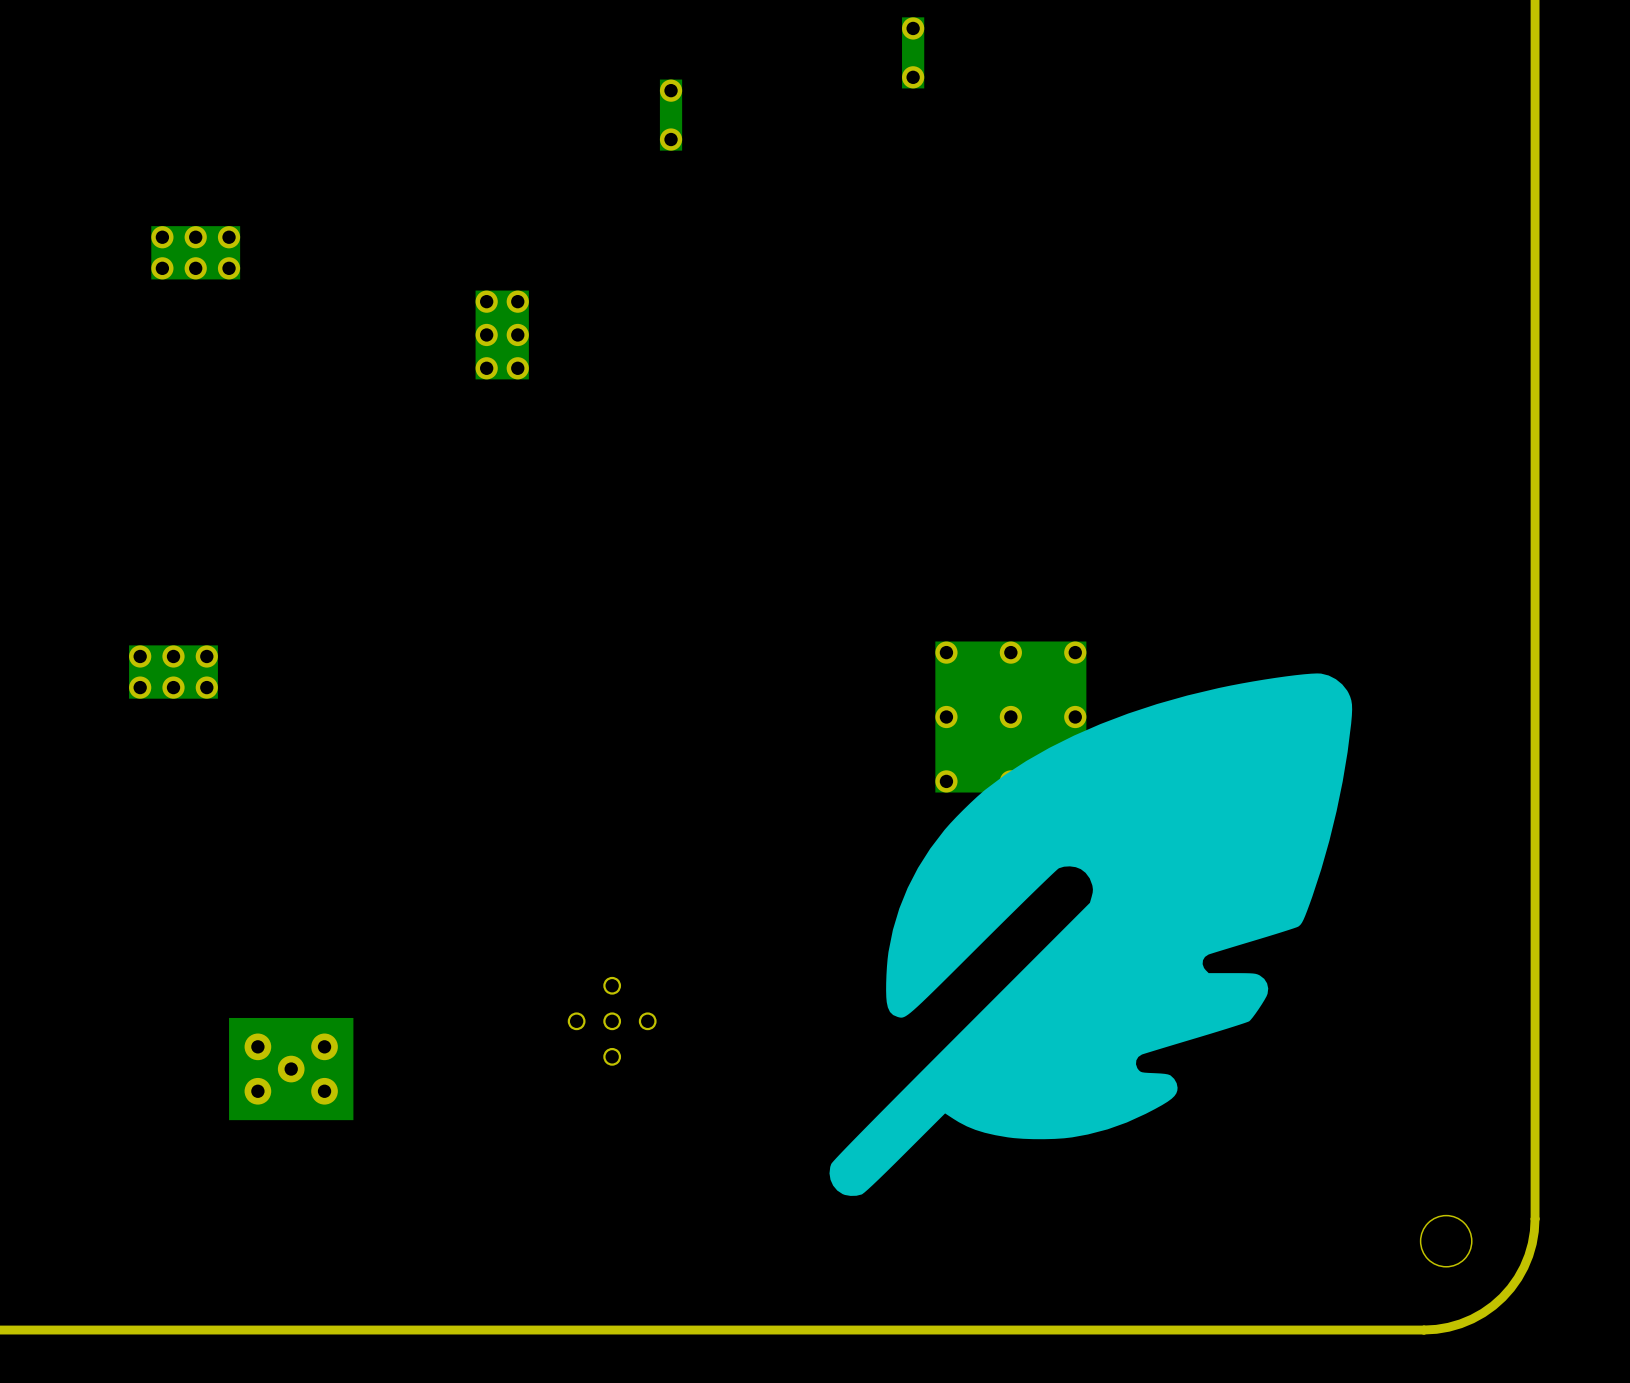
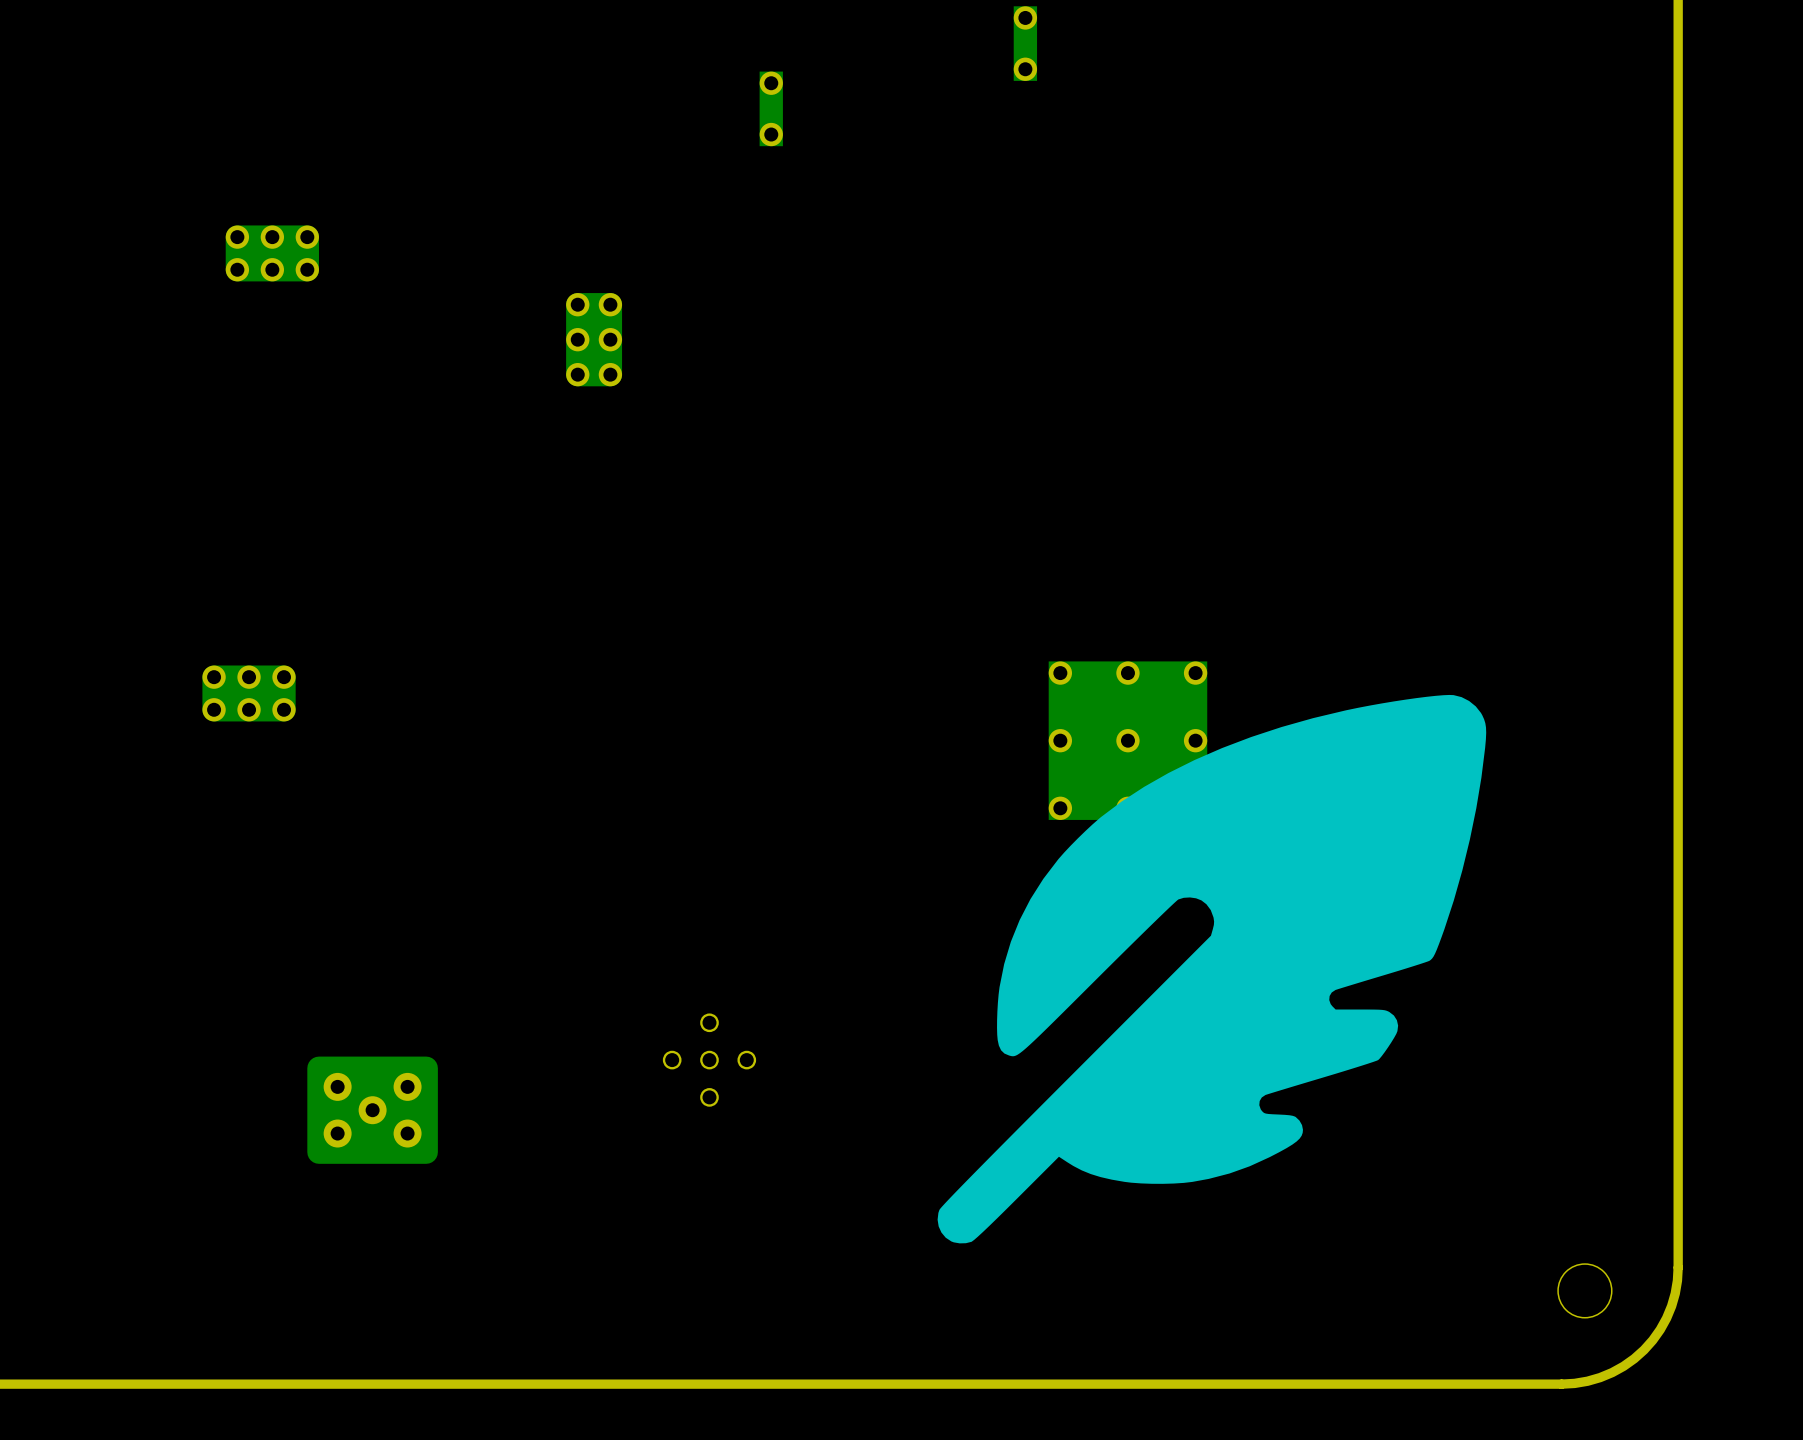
part footprint: [151, 226, 241, 280] -> [225, 225, 319, 282]
part footprint: [475, 290, 529, 380] -> [566, 293, 623, 387]
part footprint: [129, 645, 218, 699] -> [202, 665, 296, 722]
part footprint: [229, 1017, 354, 1121] -> [307, 1056, 438, 1164]

